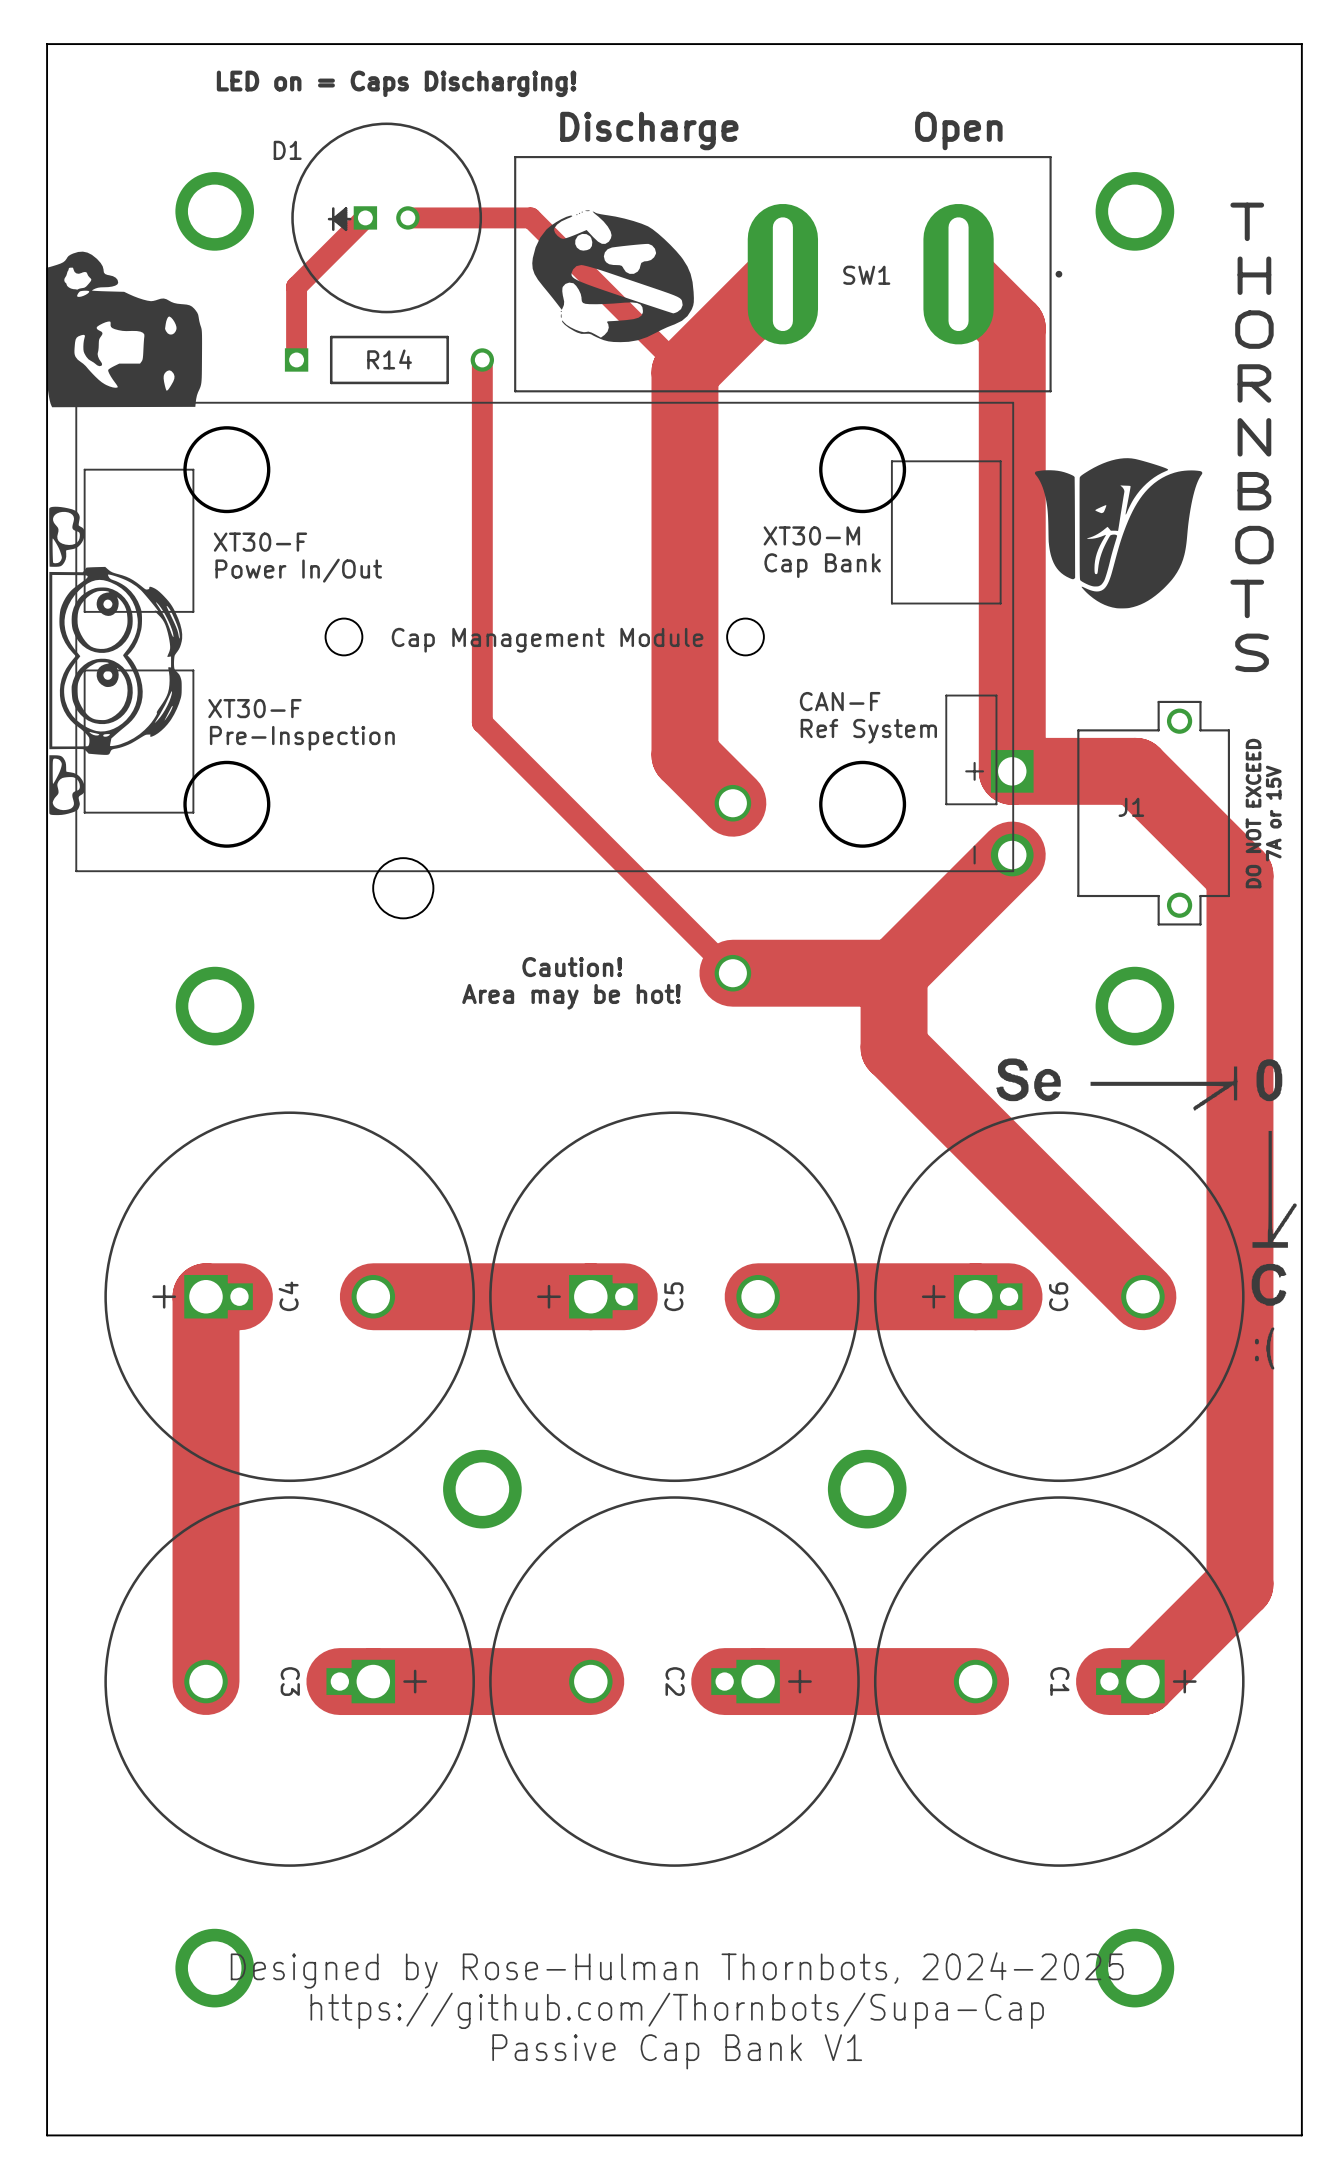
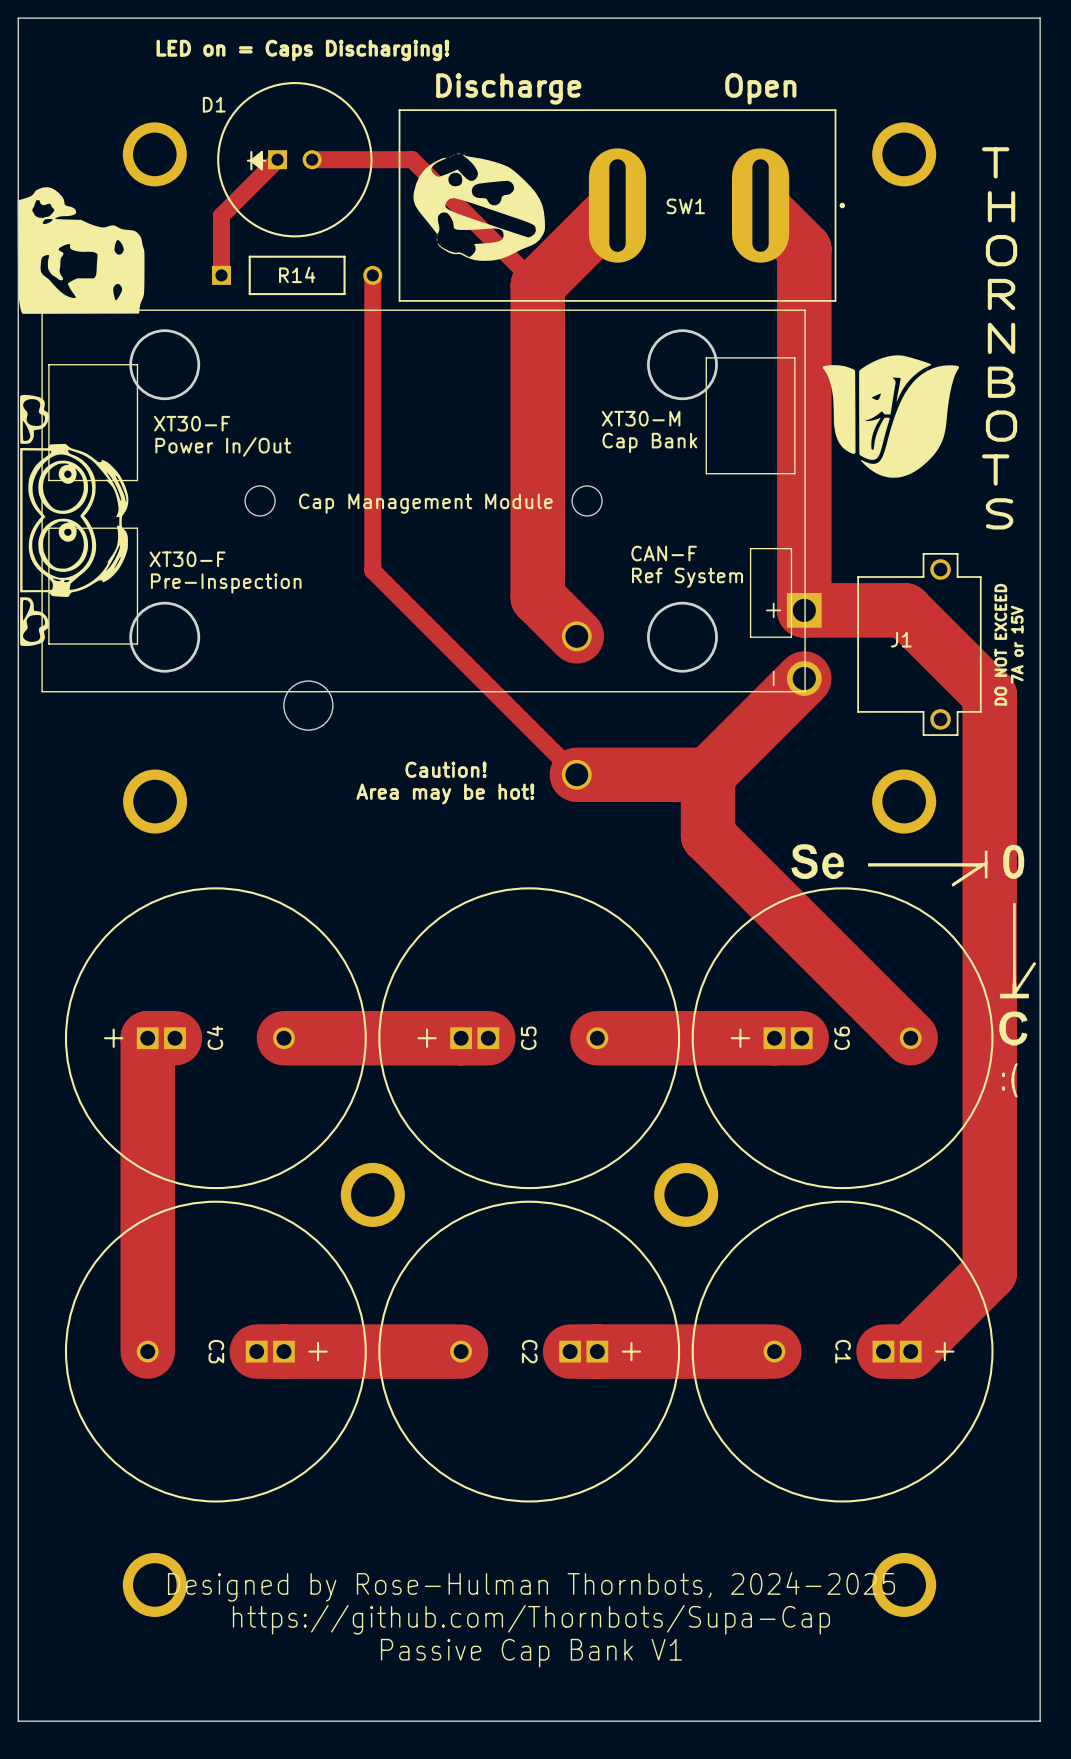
C4 footprint: [104, 1111, 475, 1483] -> [64, 887, 367, 1190]
C5 footprint: [489, 1111, 860, 1483] -> [378, 887, 681, 1190]
C6 footprint: [873, 1111, 1245, 1483] -> [691, 887, 994, 1190]
C3 footprint: [104, 1496, 475, 1867] -> [64, 1200, 367, 1503]
C2 footprint: [489, 1496, 860, 1867] -> [378, 1200, 681, 1503]
C1 footprint: [873, 1496, 1245, 1867] -> [691, 1200, 994, 1503]

